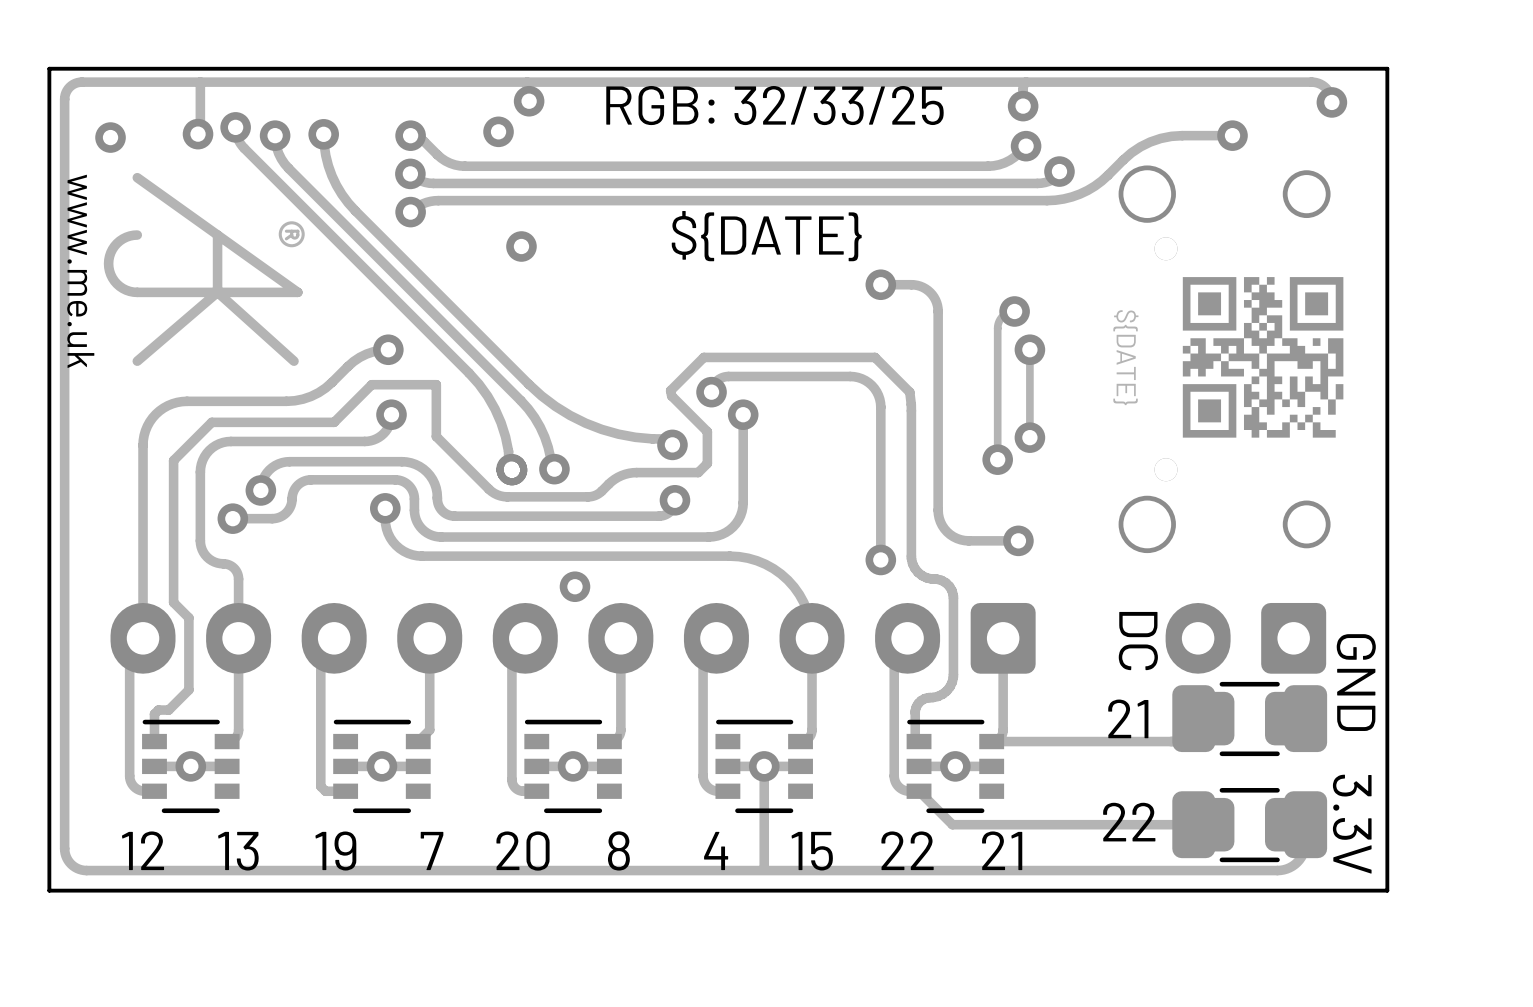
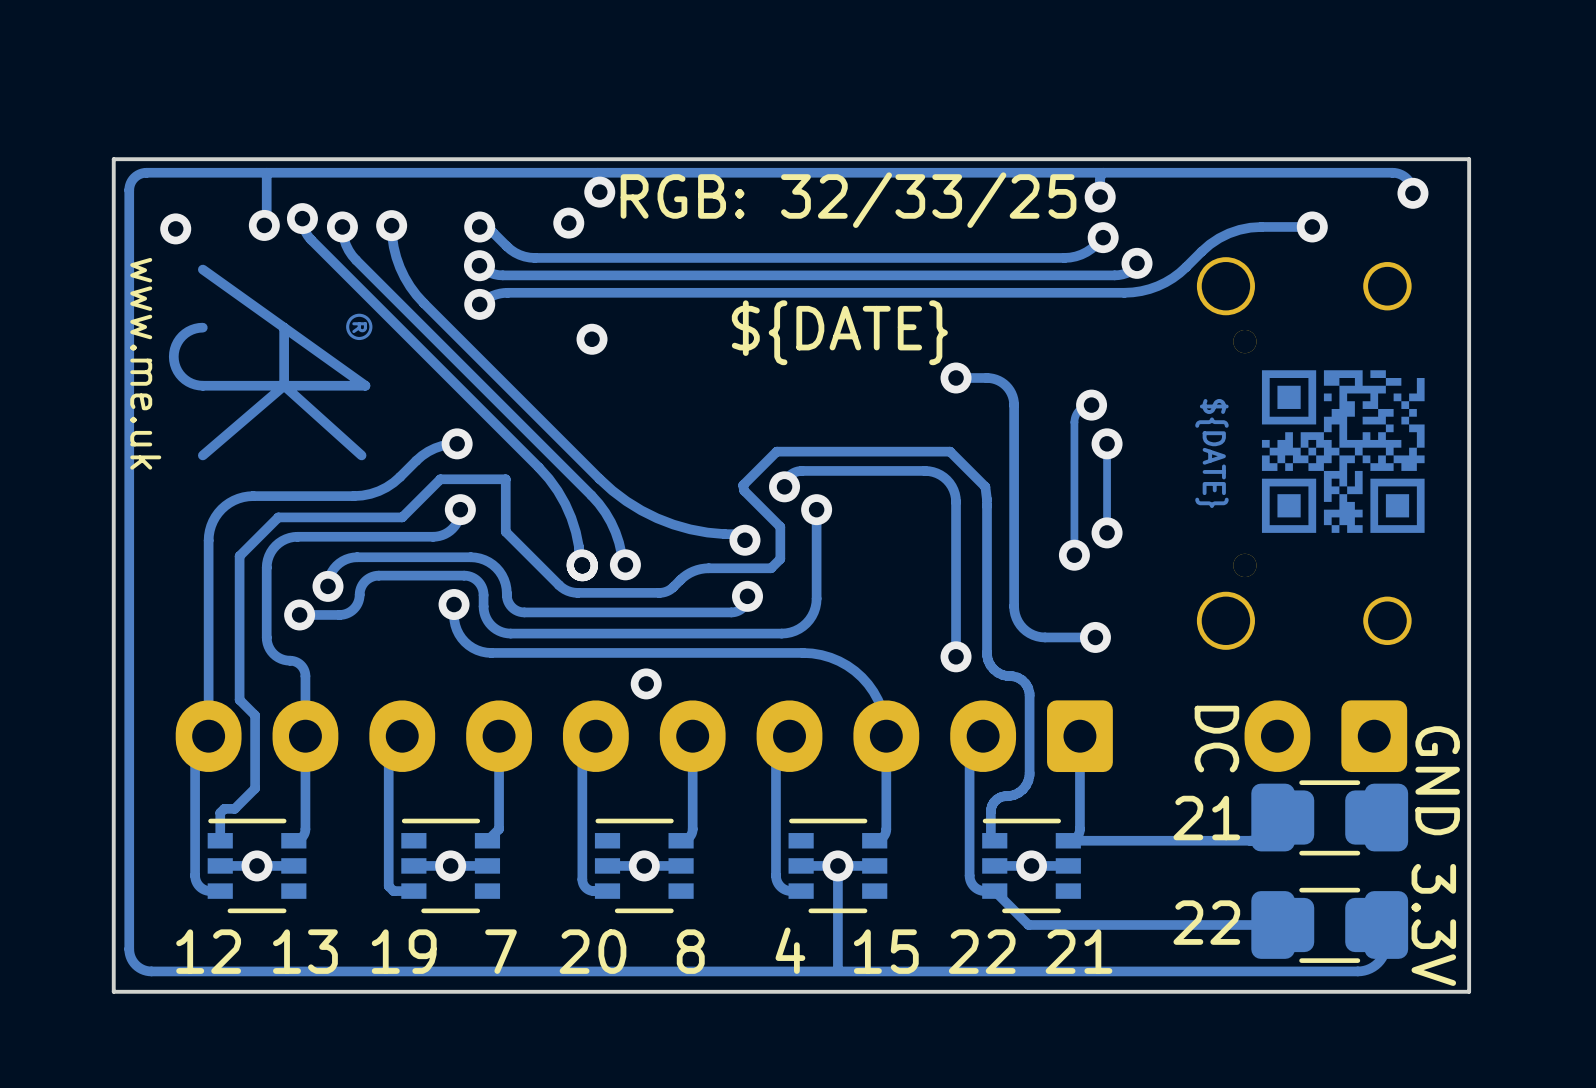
part footprint: [1182, 277, 1344, 438] -> [1261, 370, 1425, 533]
text: none -> ${DATE} (1211, 453)

